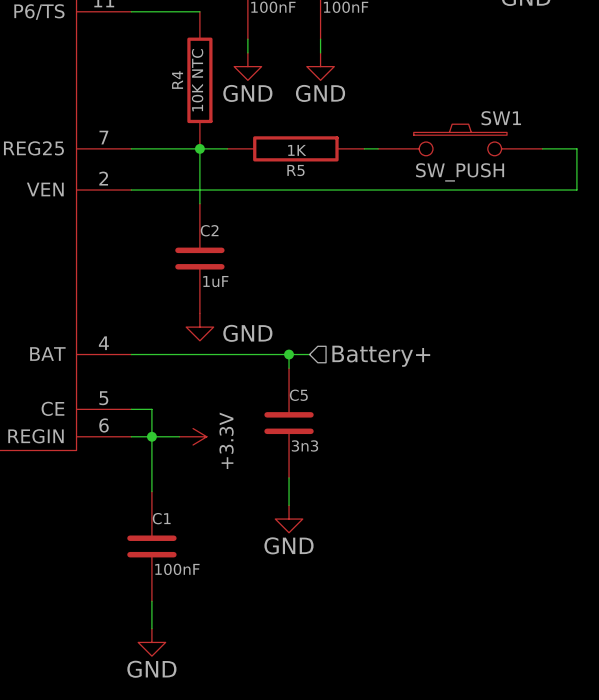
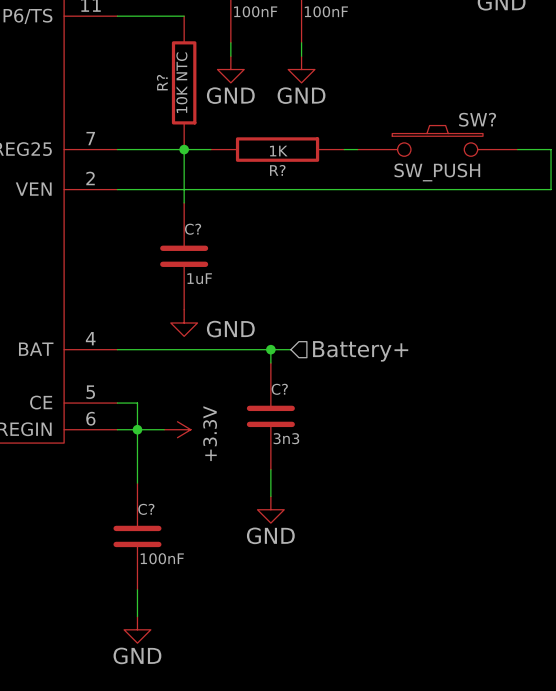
R4 name: R4 (177, 80) -> R? (162, 82)
SW1 name: SW1 (501, 118) -> SW? (477, 119)
R5 name: R5 (295, 170) -> R? (277, 170)
C2 name: C2 (209, 230) -> C? (193, 229)
C5 name: C5 (298, 395) -> C? (279, 389)
C1 name: C1 (161, 518) -> C? (146, 509)

